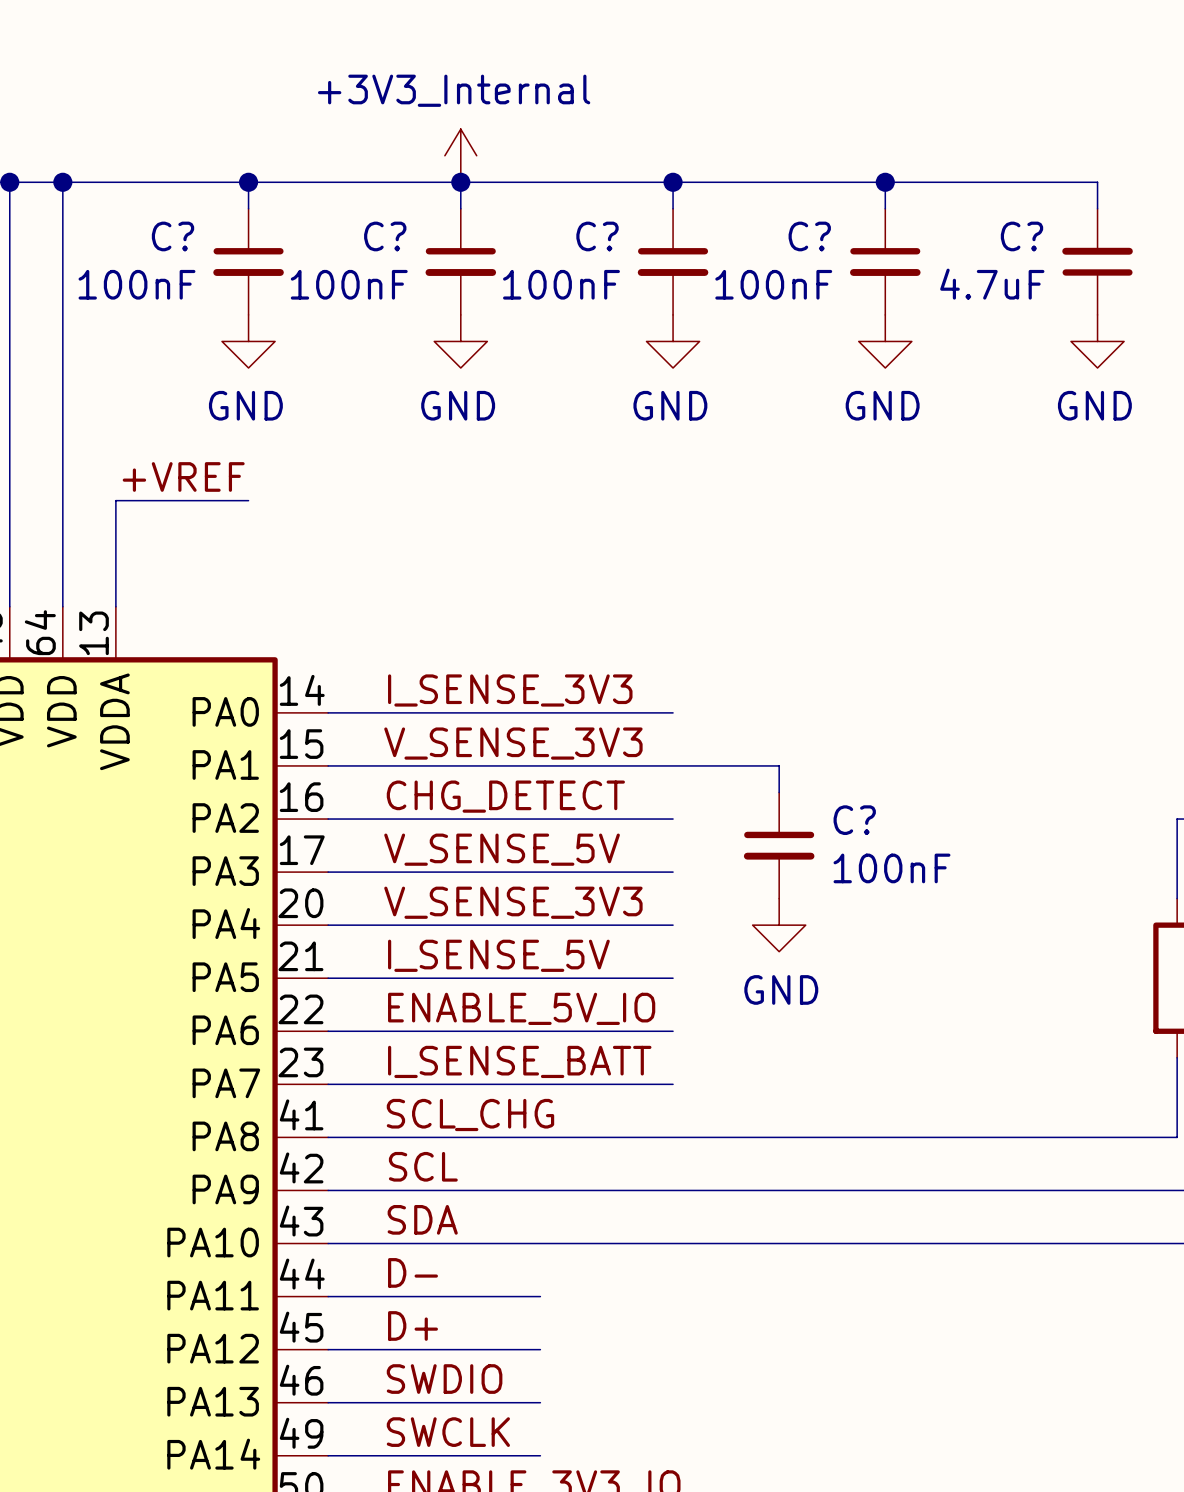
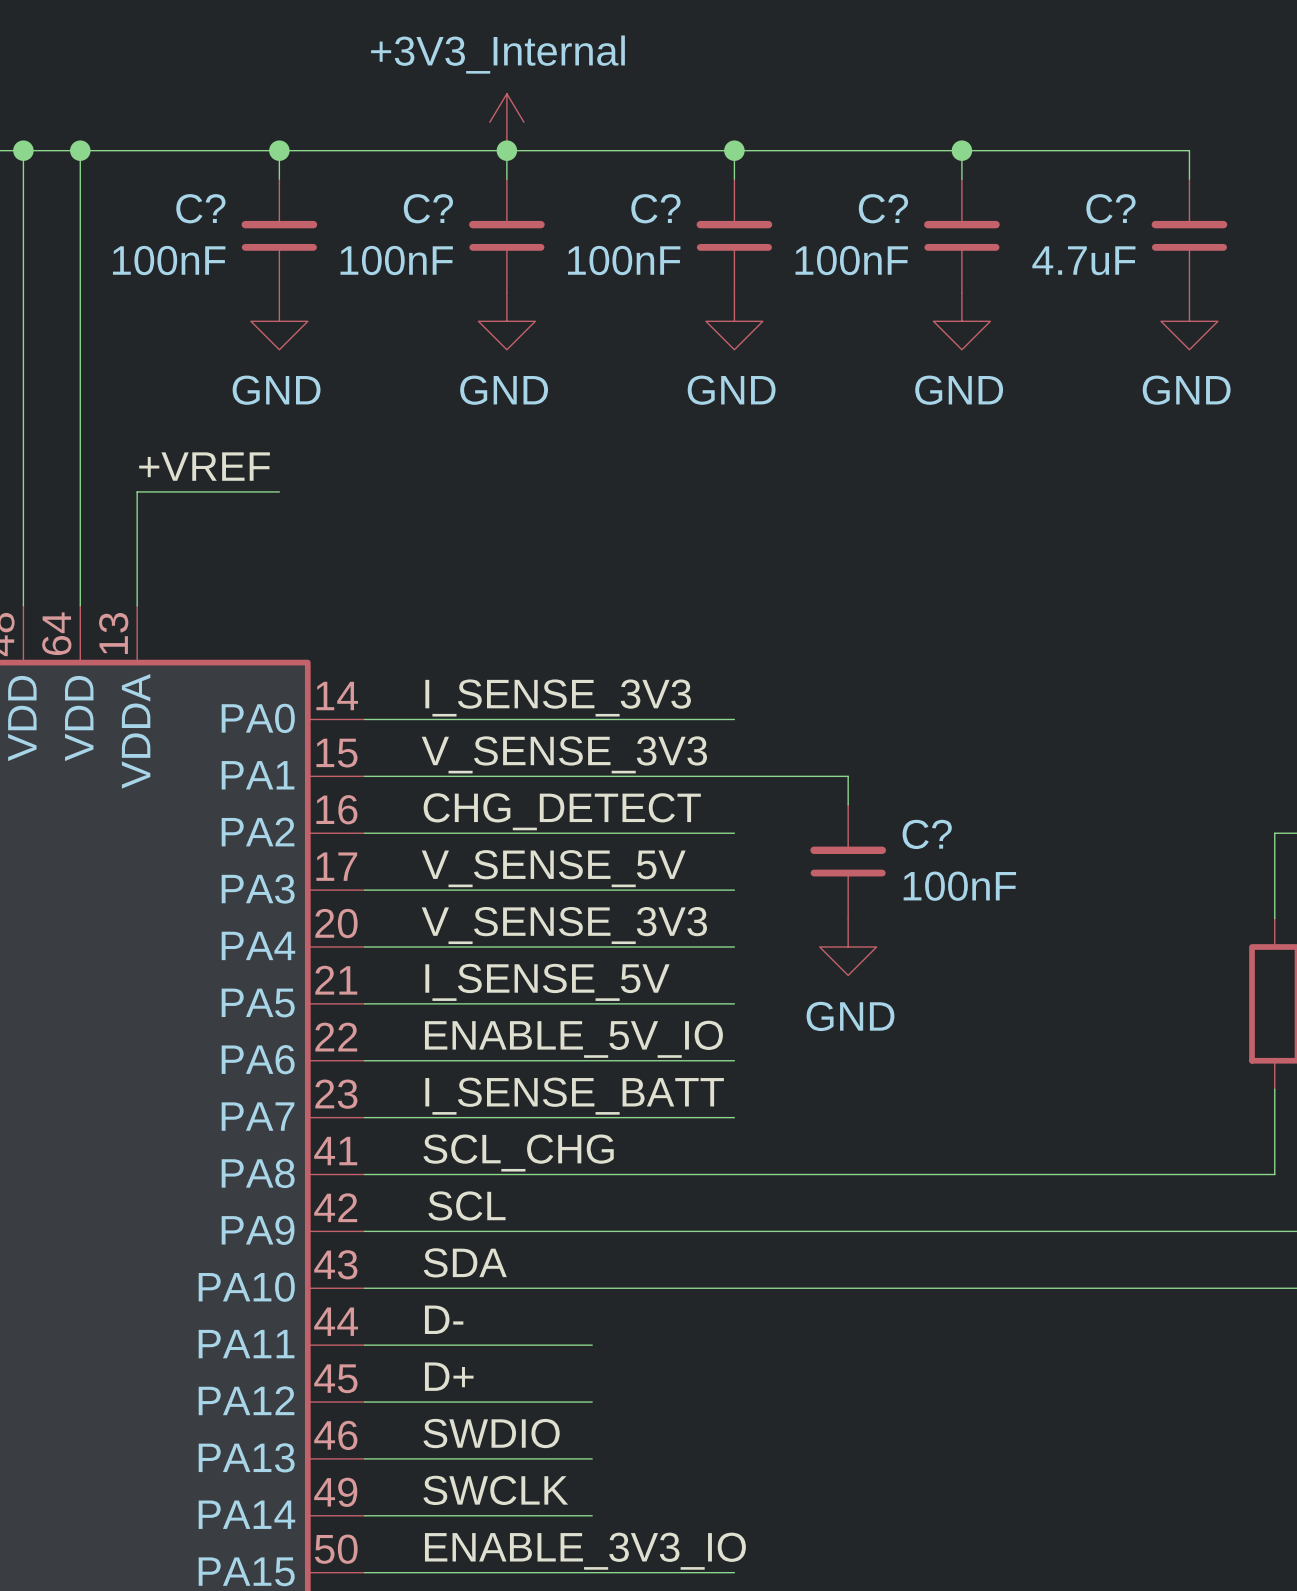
C? rotation: 0° (248, 262) -> 180° (279, 235)
C? rotation: 0° (460, 262) -> 180° (506, 235)
C? rotation: 0° (673, 262) -> 180° (734, 235)
C? rotation: 0° (885, 262) -> 180° (961, 235)
C? rotation: 0° (779, 845) -> 180° (848, 861)

